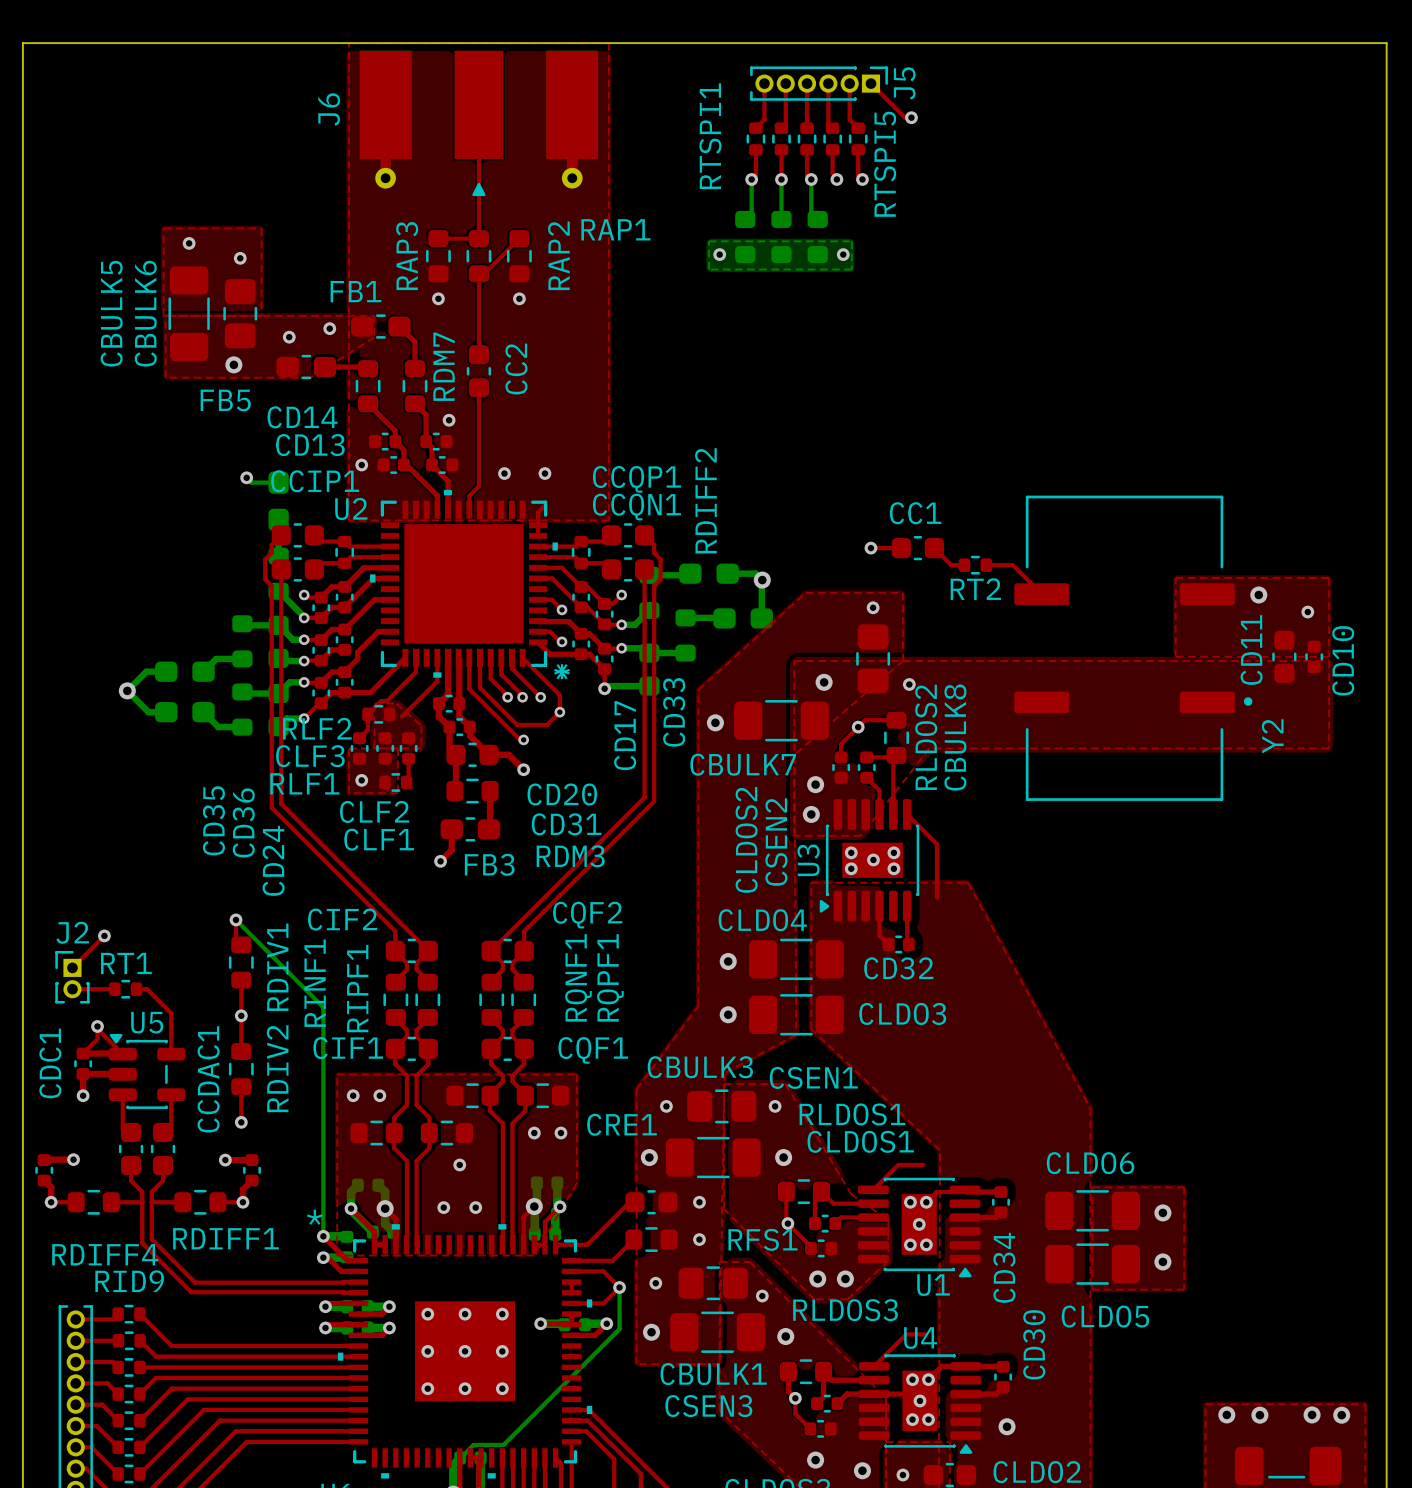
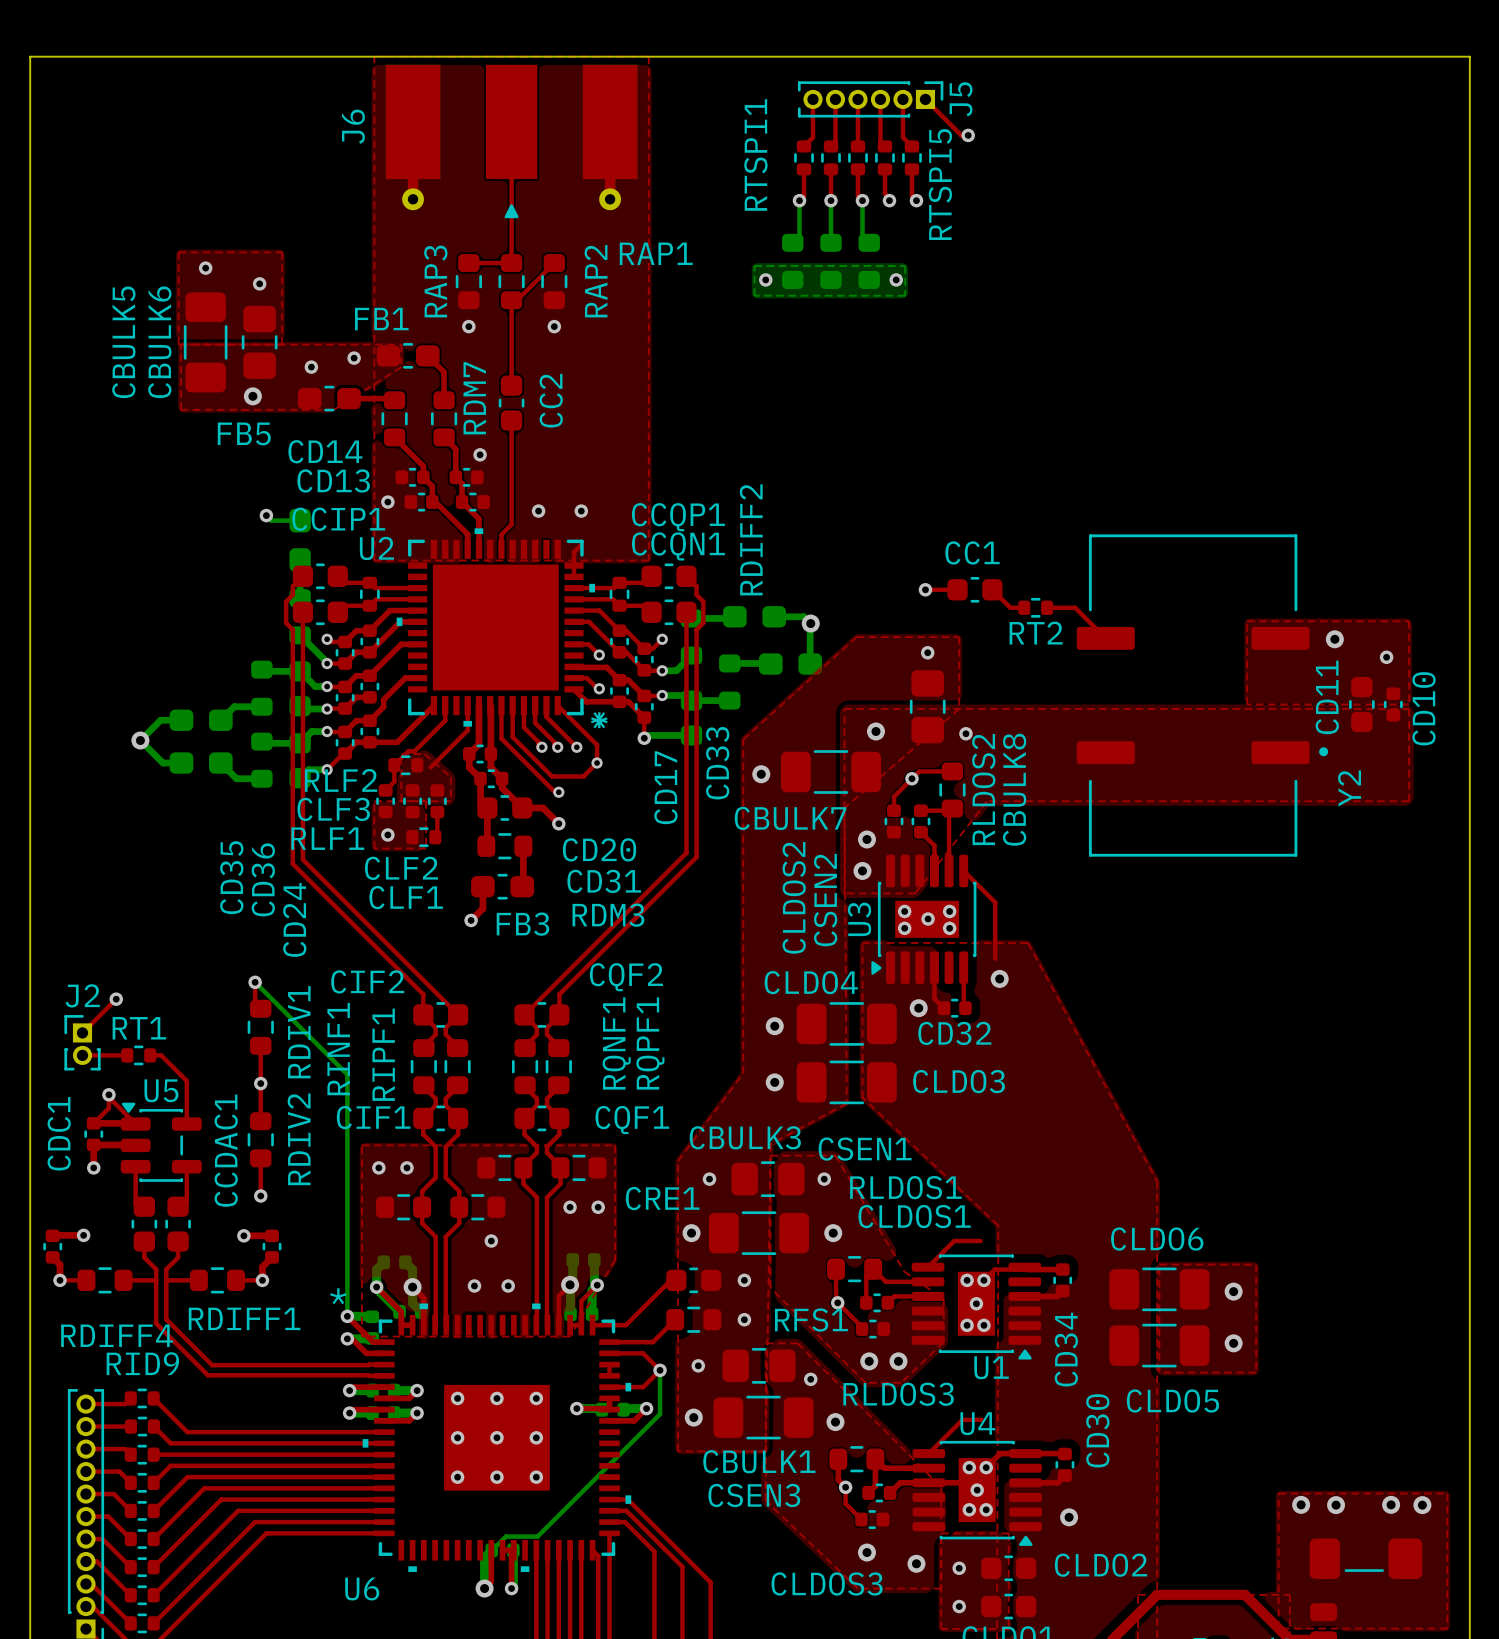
via: none -> (999, 978)
via: none -> (918, 1008)

